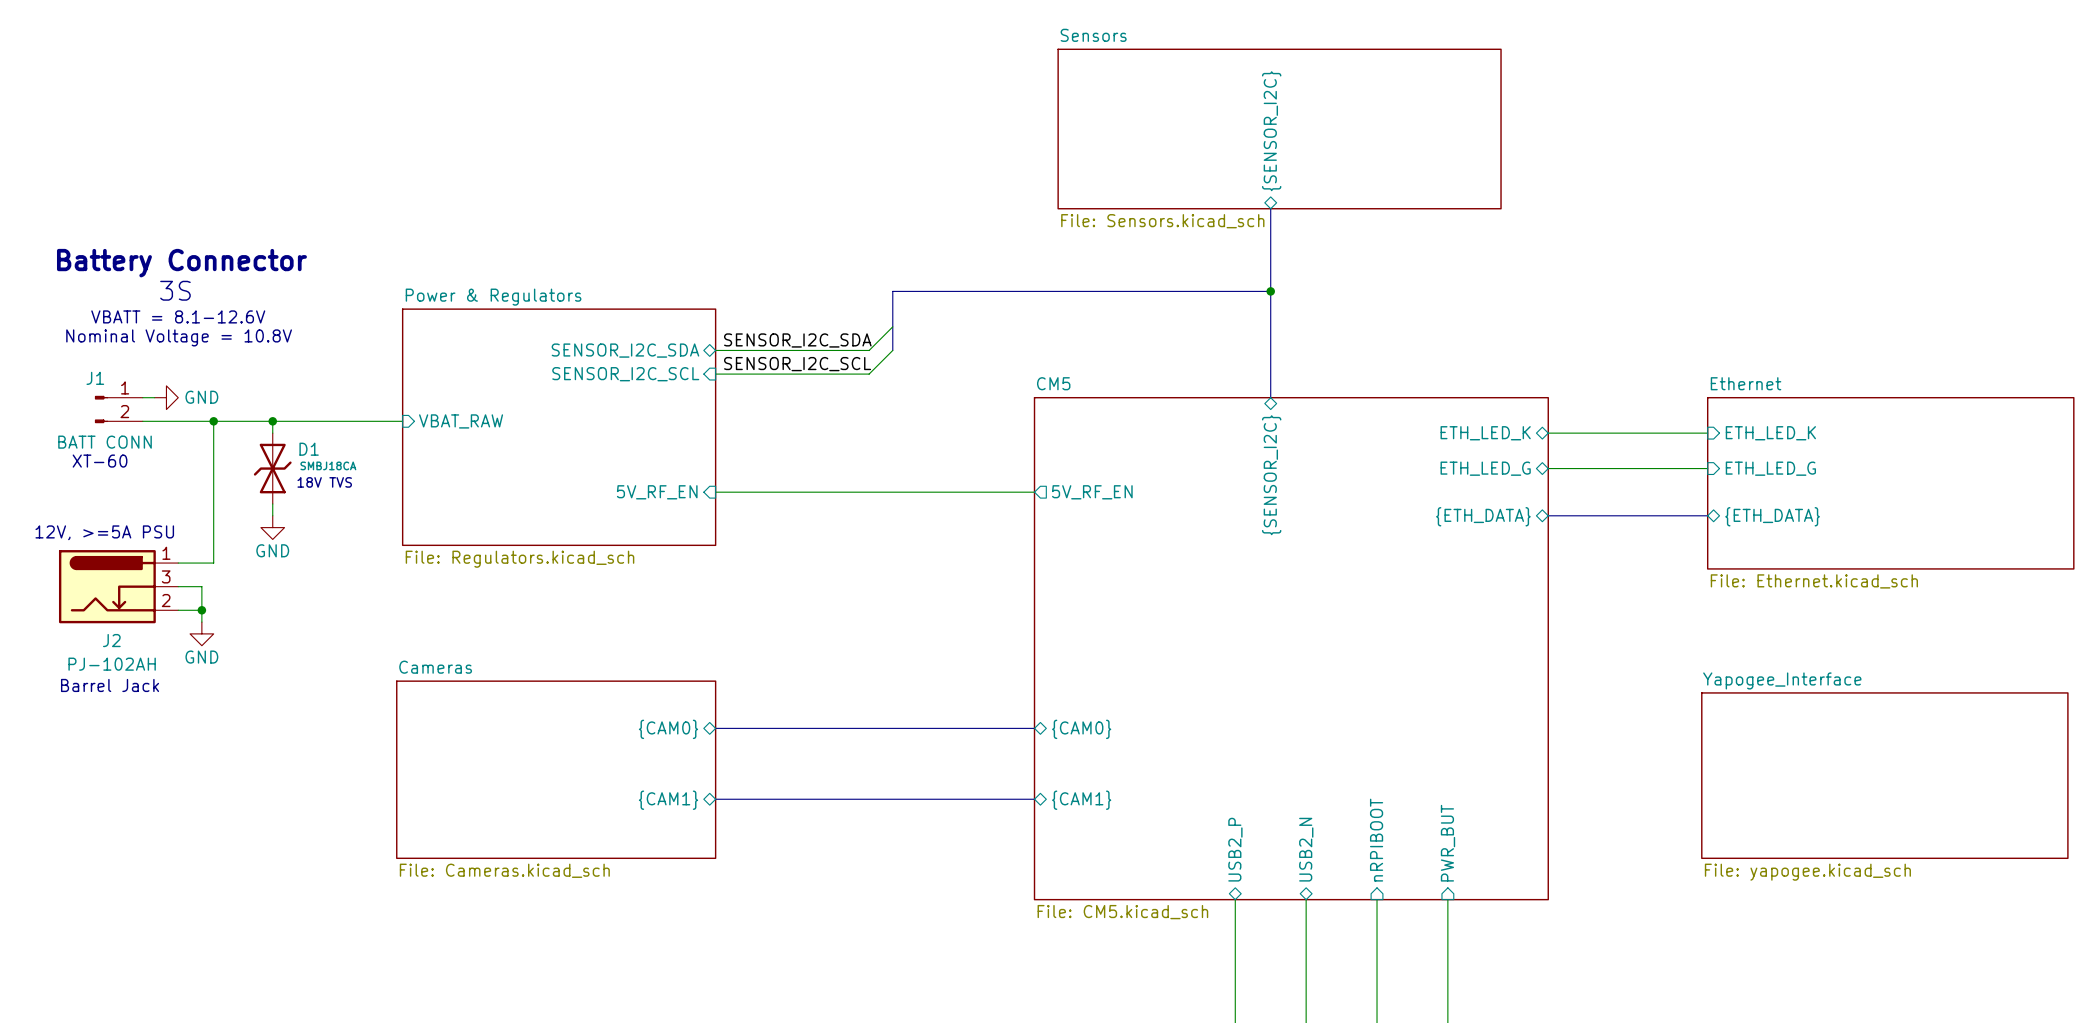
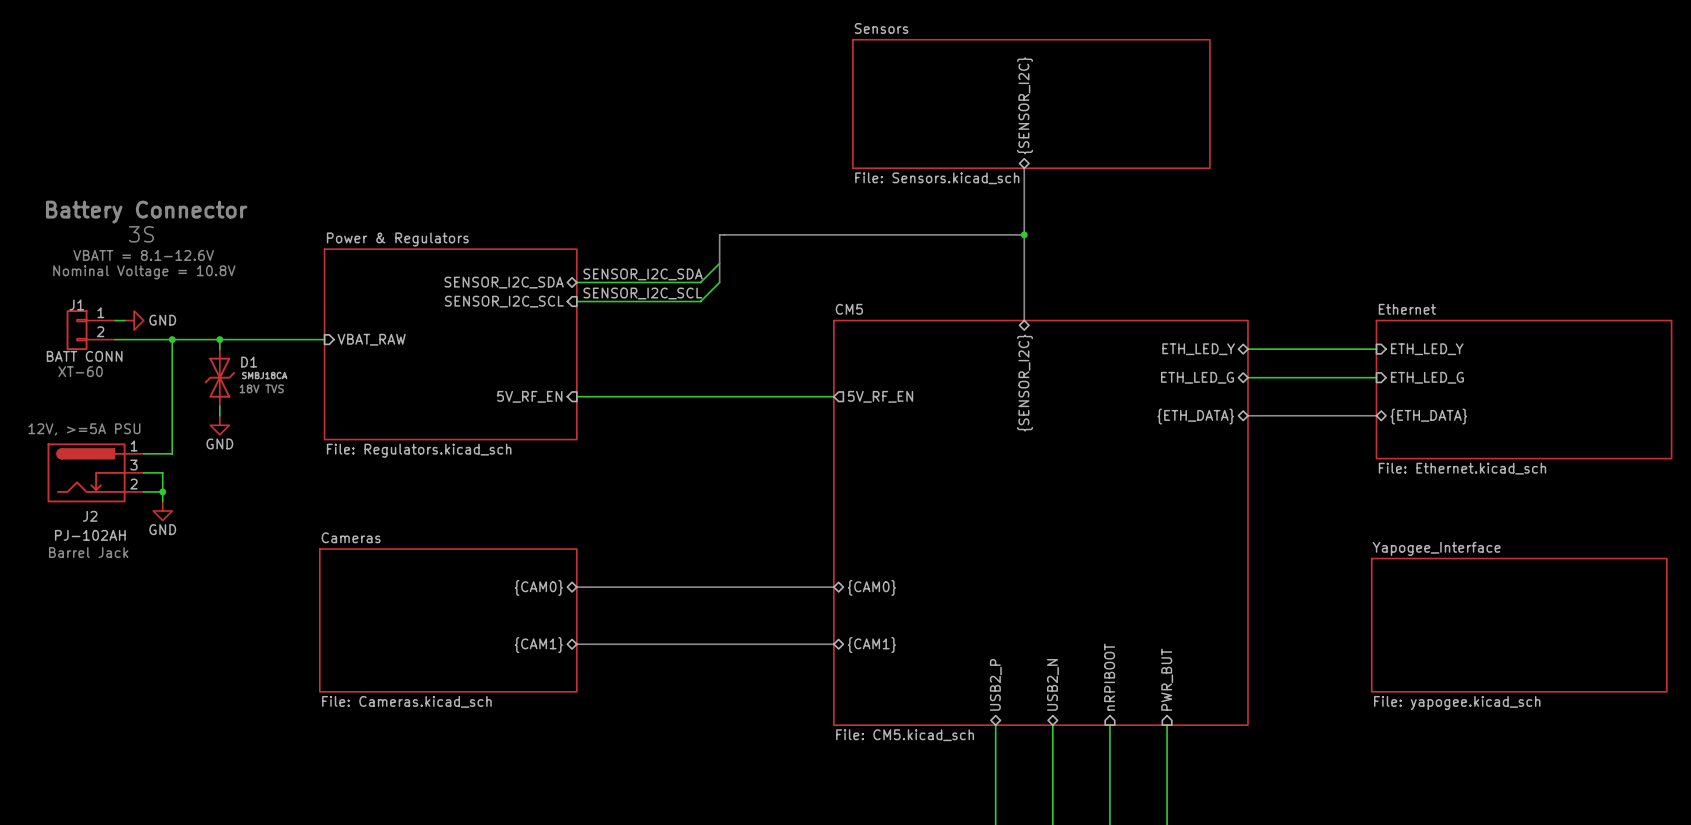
J1 symbol: [94, 395, 143, 424] -> [66, 310, 116, 351]
sheet pin: ETH_LED_K (1485, 433) -> ETH_LED_Y (1198, 349)
sheet pin: ETH_LED_K (1770, 433) -> ETH_LED_Y (1427, 349)

